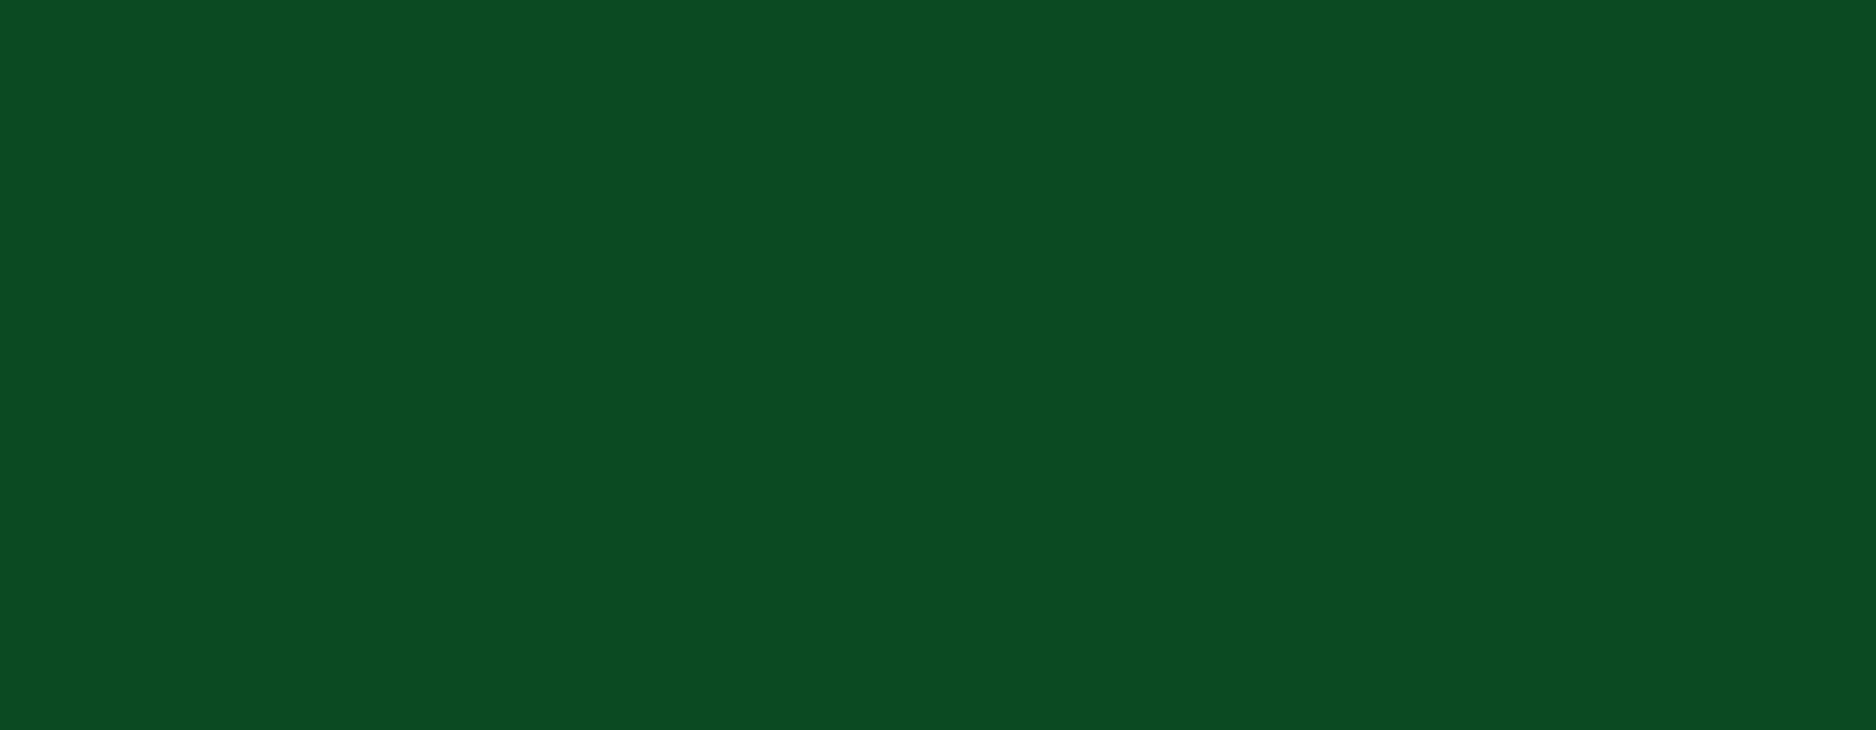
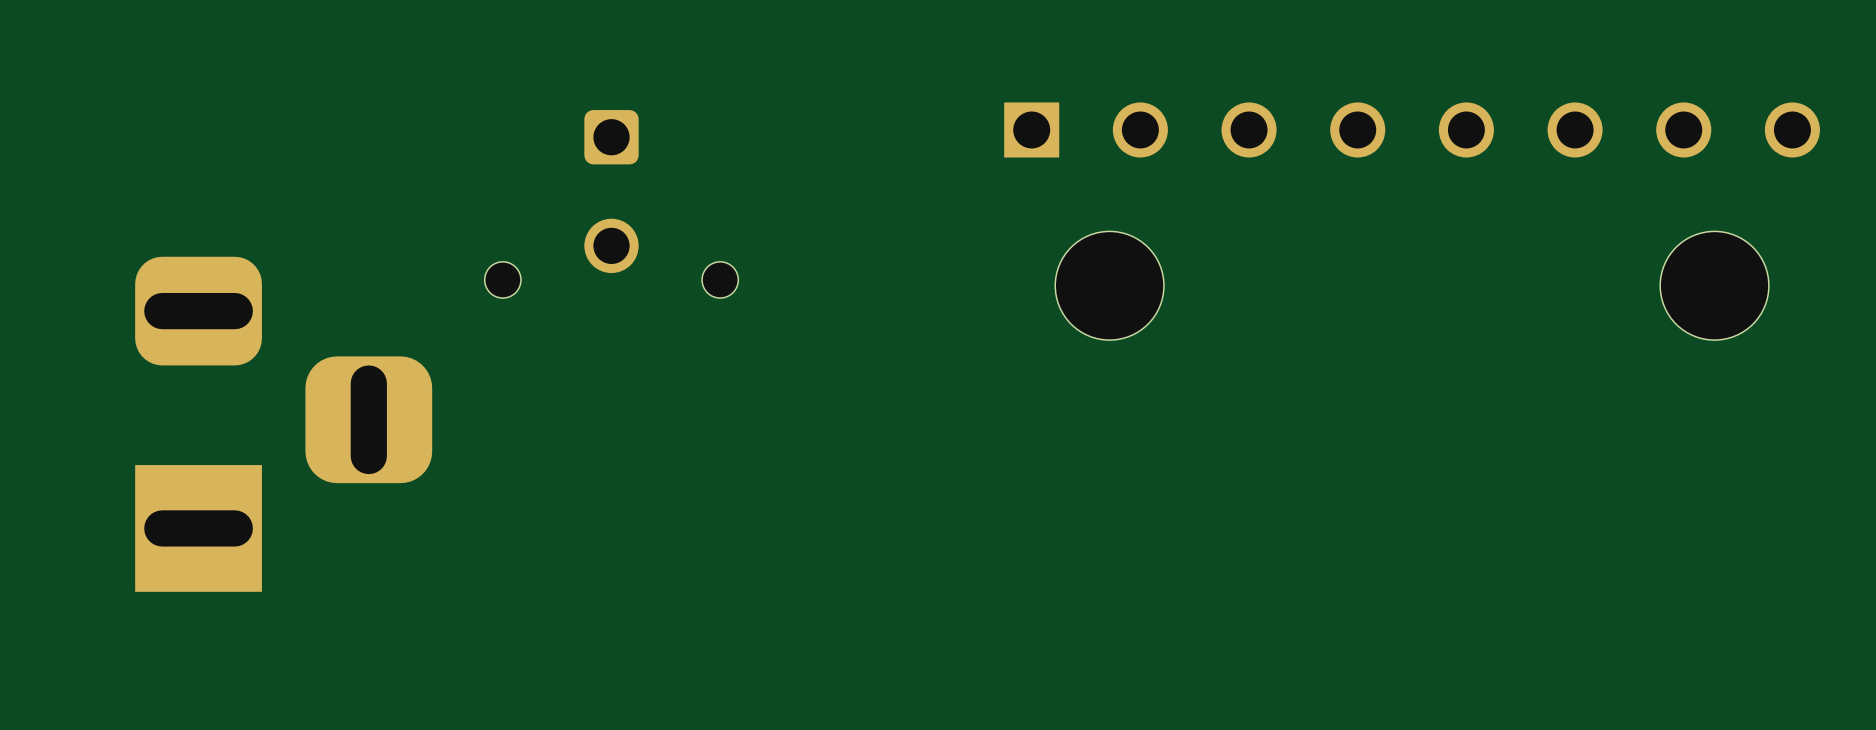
part: none -> (611, 204)
part: none -> (1412, 221)
part: none -> (283, 424)

